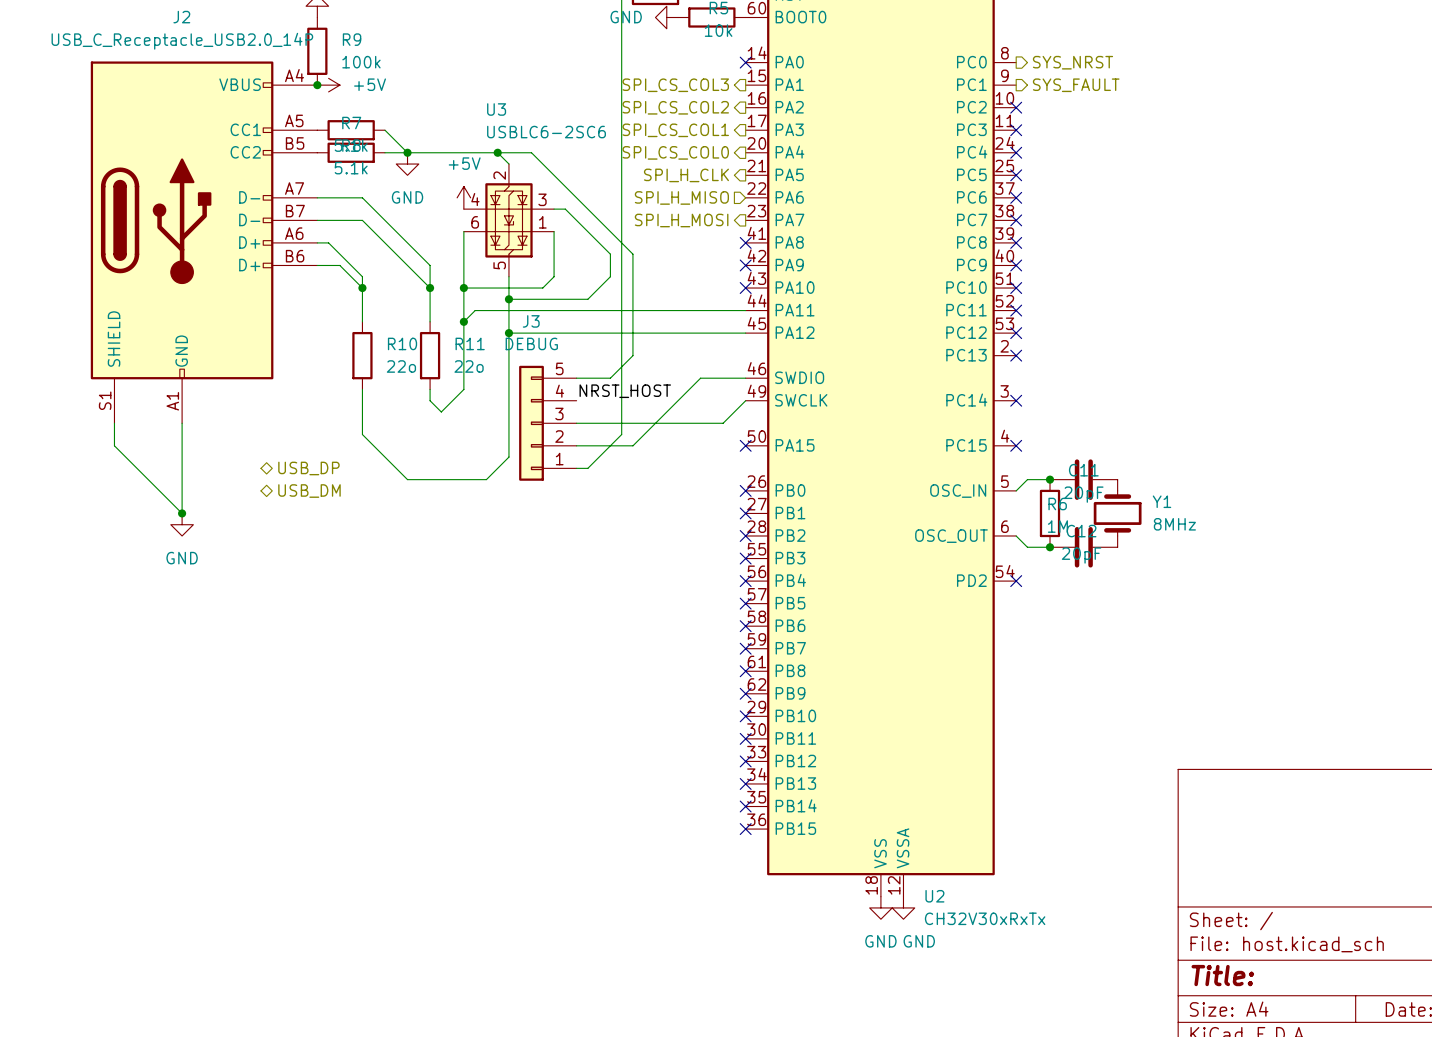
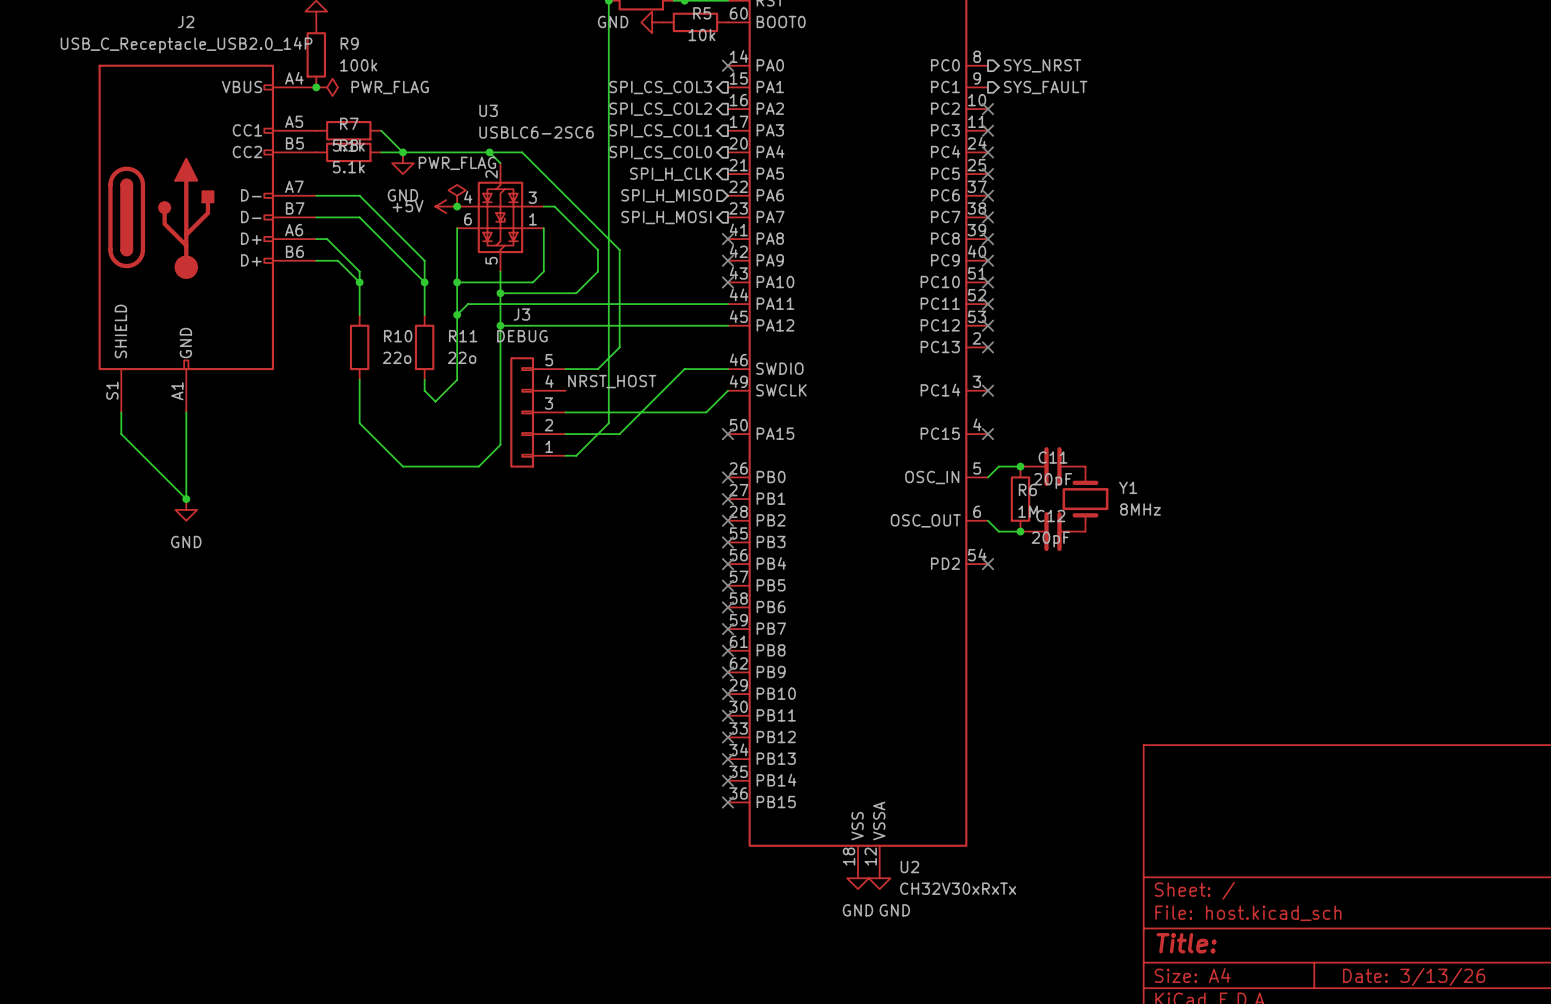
power symbol: +5V (328, 85) -> PWR_FLAG (327, 87)
power symbol: +5V (463, 197) -> PWR_FLAG (457, 195)
power symbol: none -> +5V (446, 206)
junction: none -> (457, 206)
hierarchical label: USB_DP (308, 468) -> none
hierarchical label: USB_DM (309, 491) -> none

